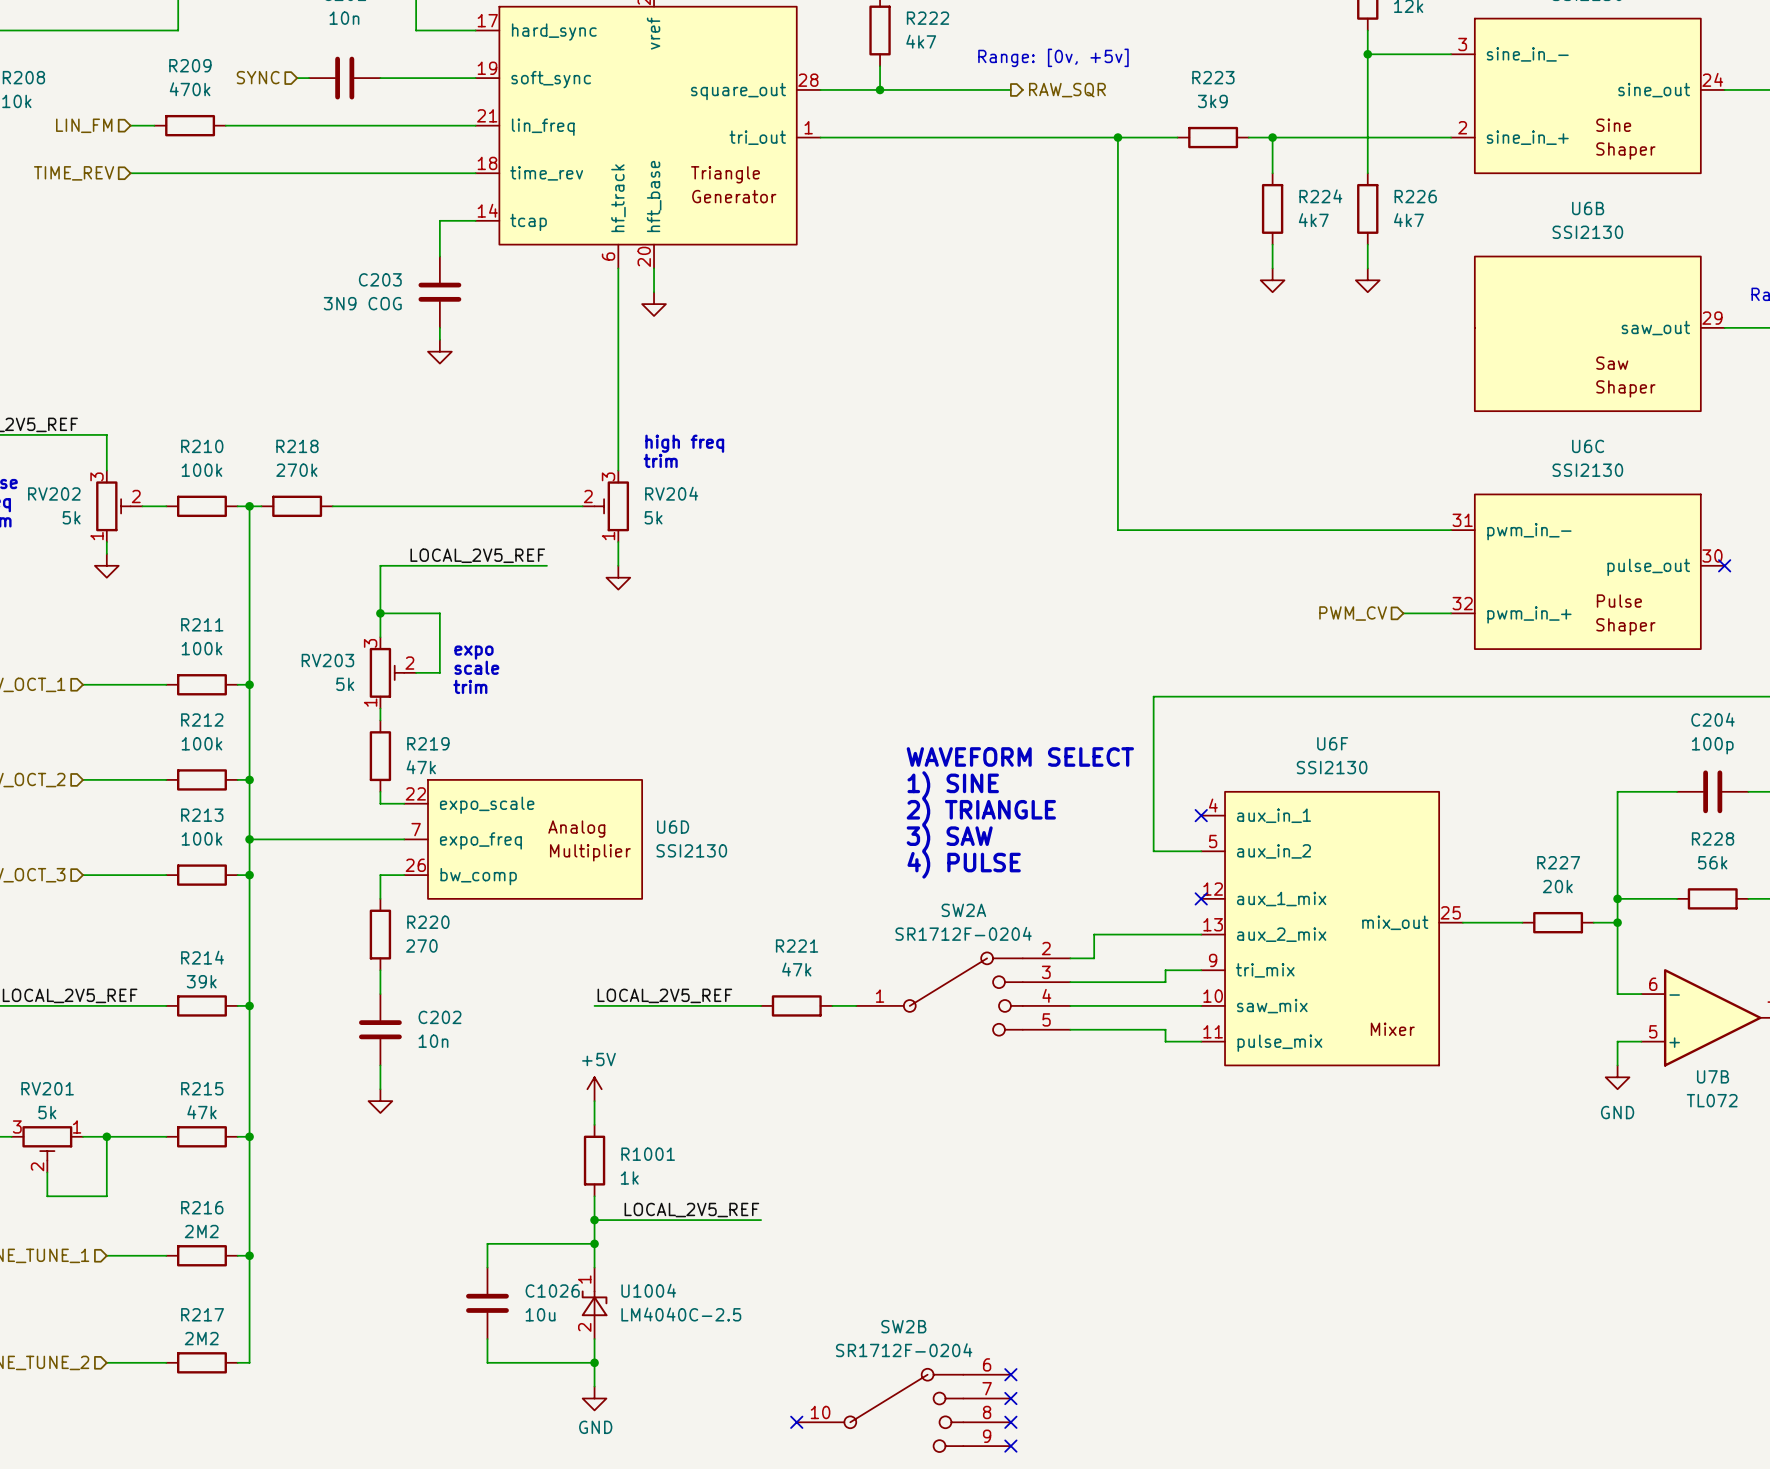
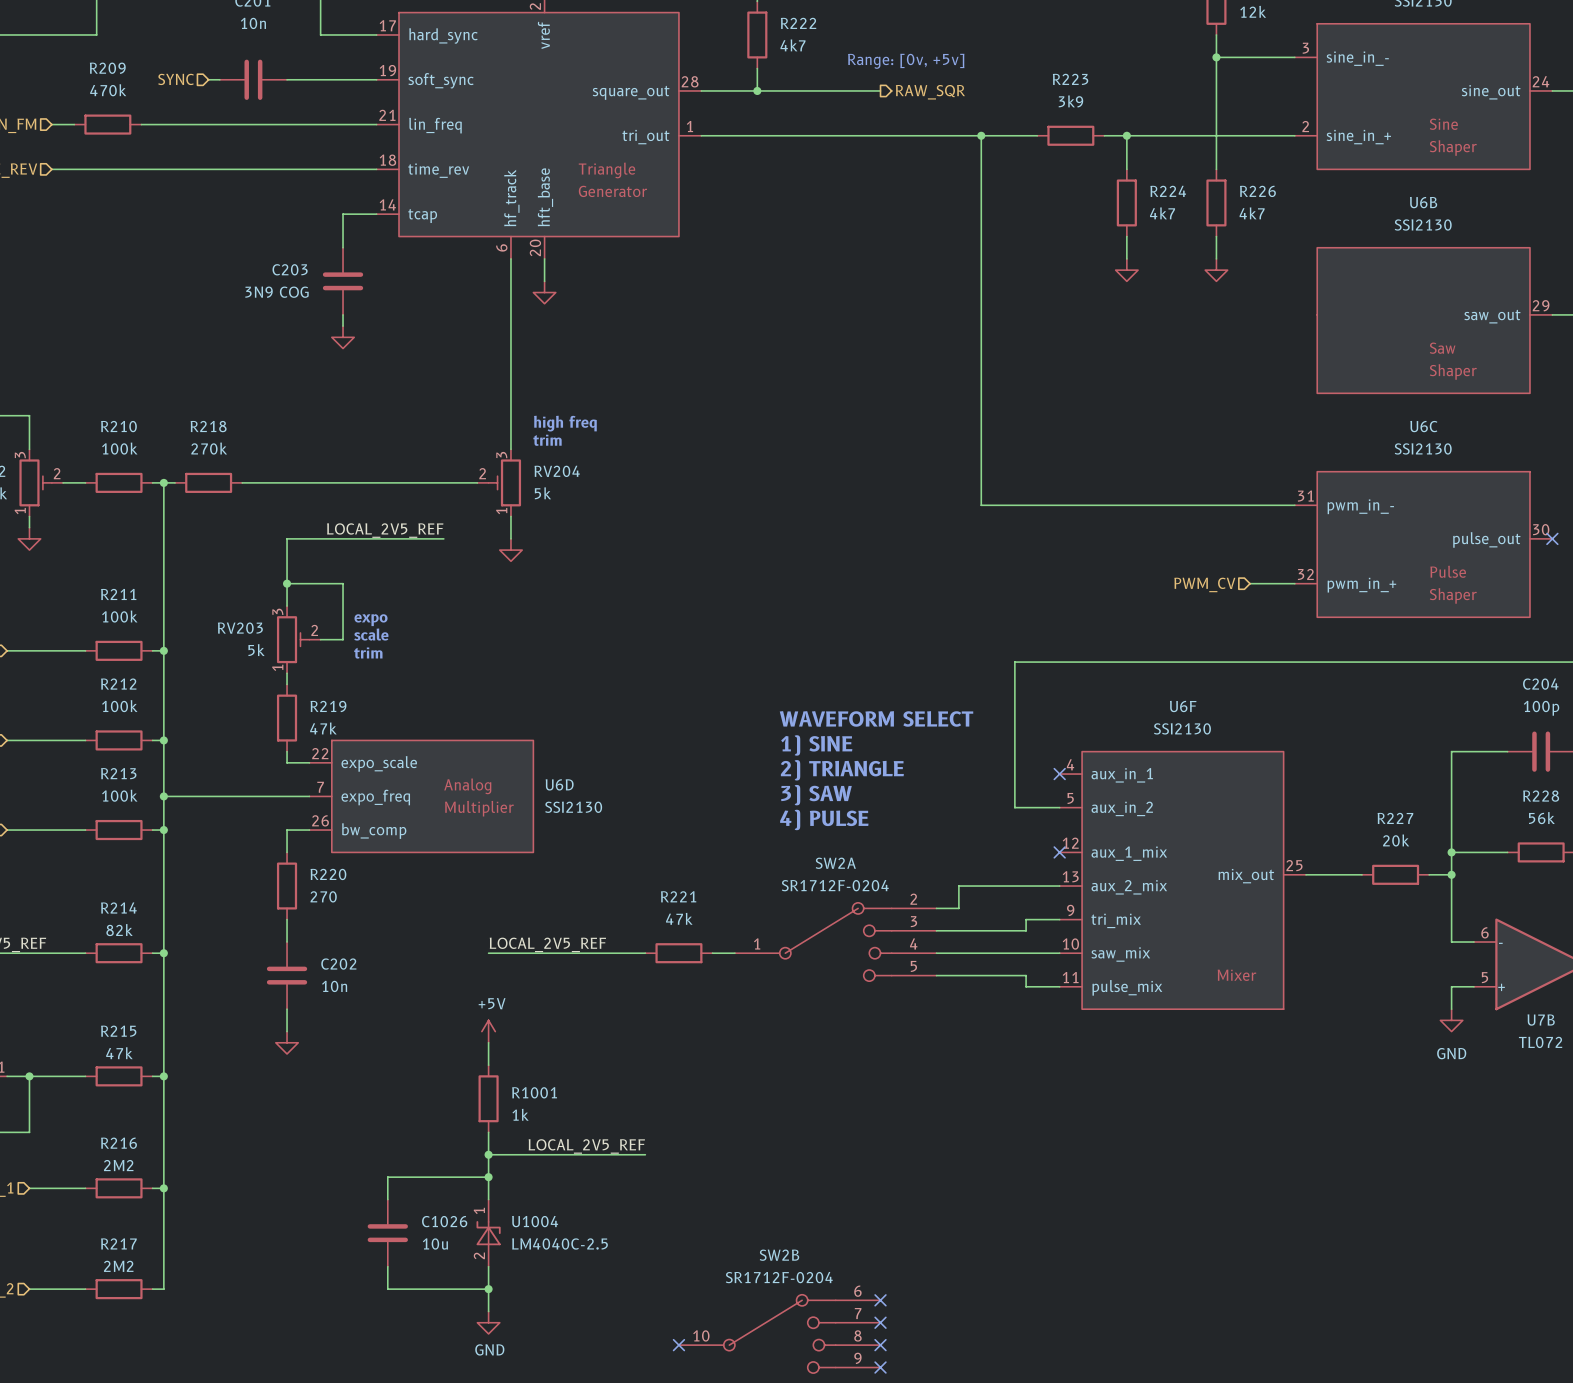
R214 value: 39k (201, 981) -> 82k (119, 930)

